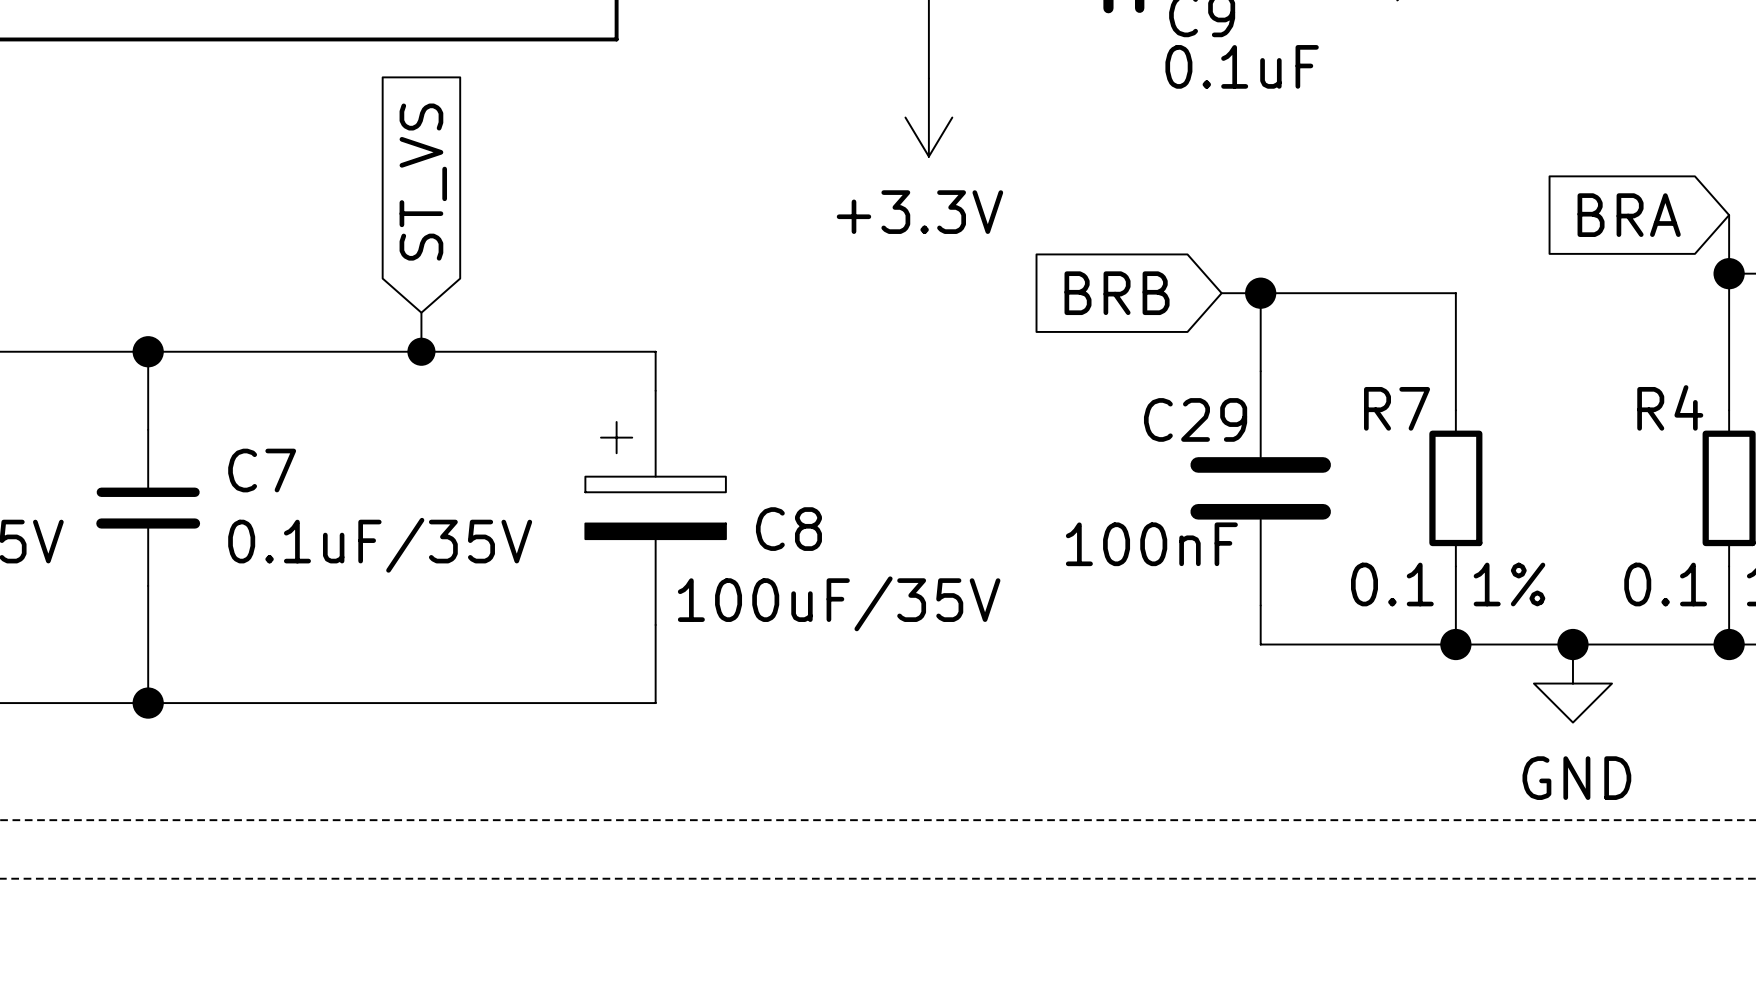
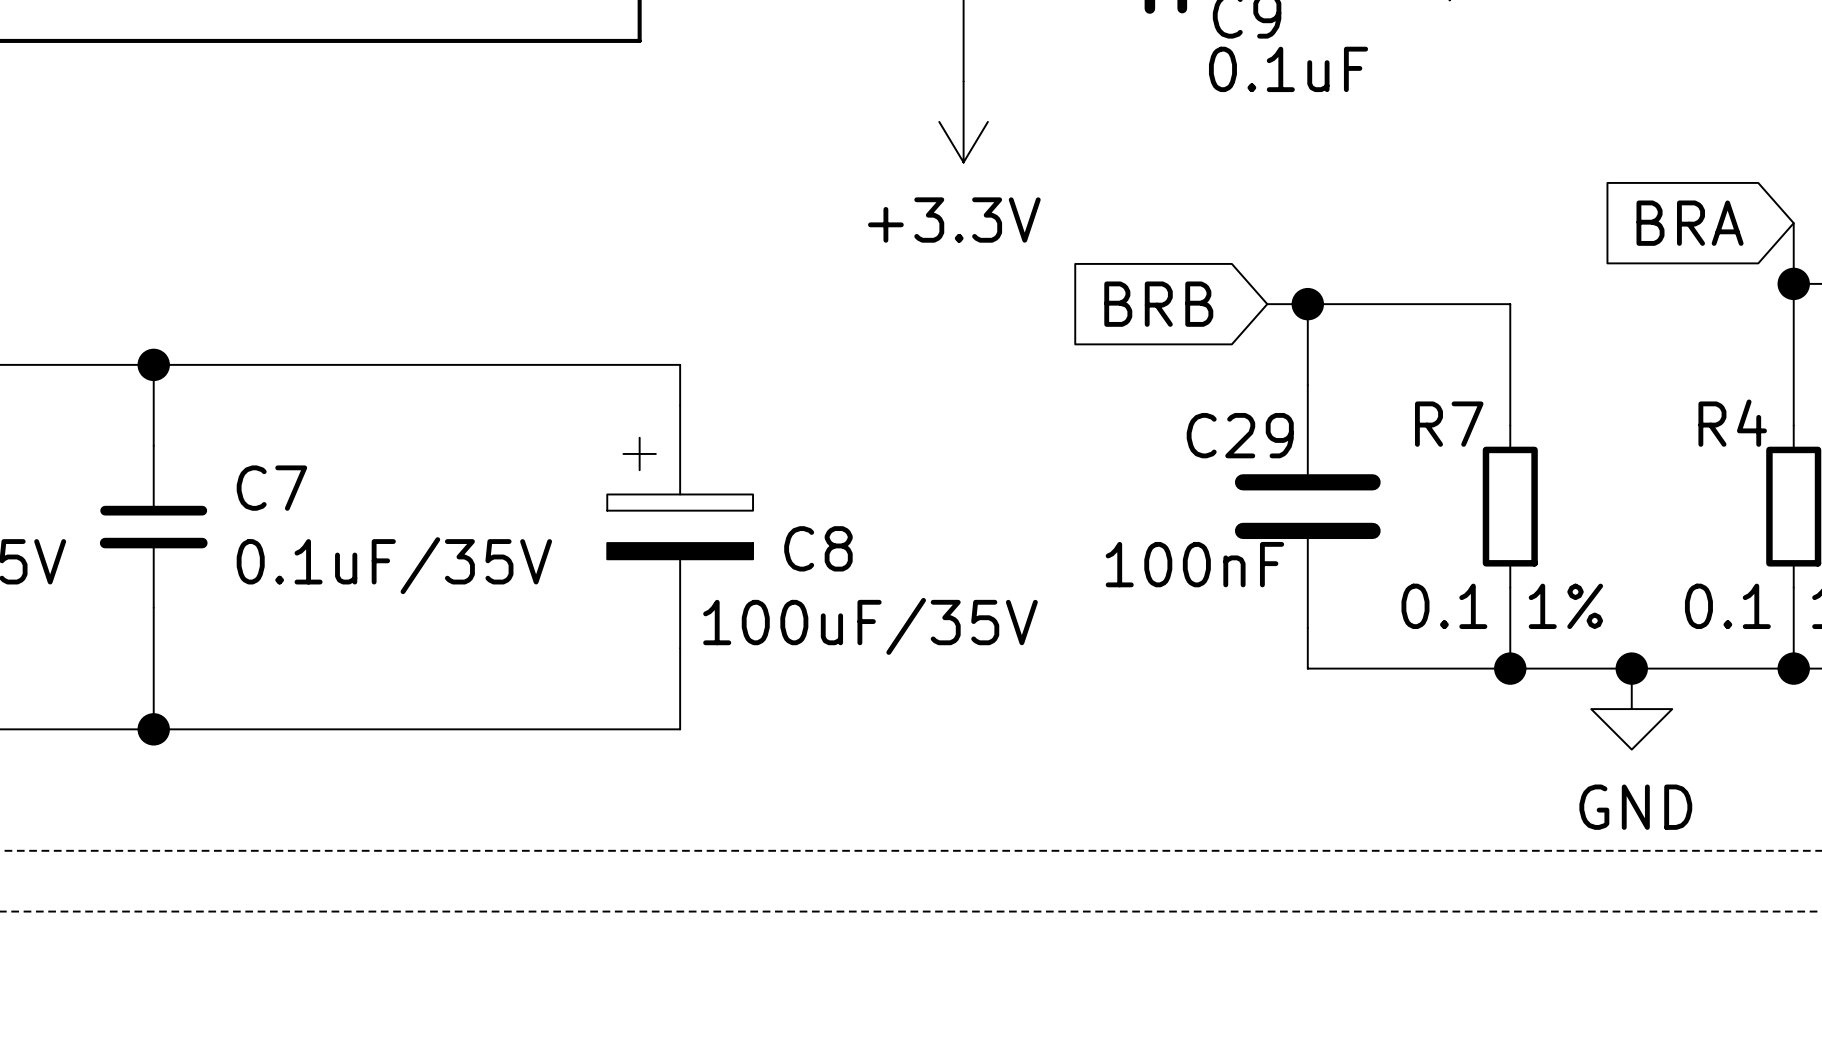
global label: ST_VS (423, 182) -> none
wire: (421, 312) (421, 351) -> none
junction: (421, 351) -> none

